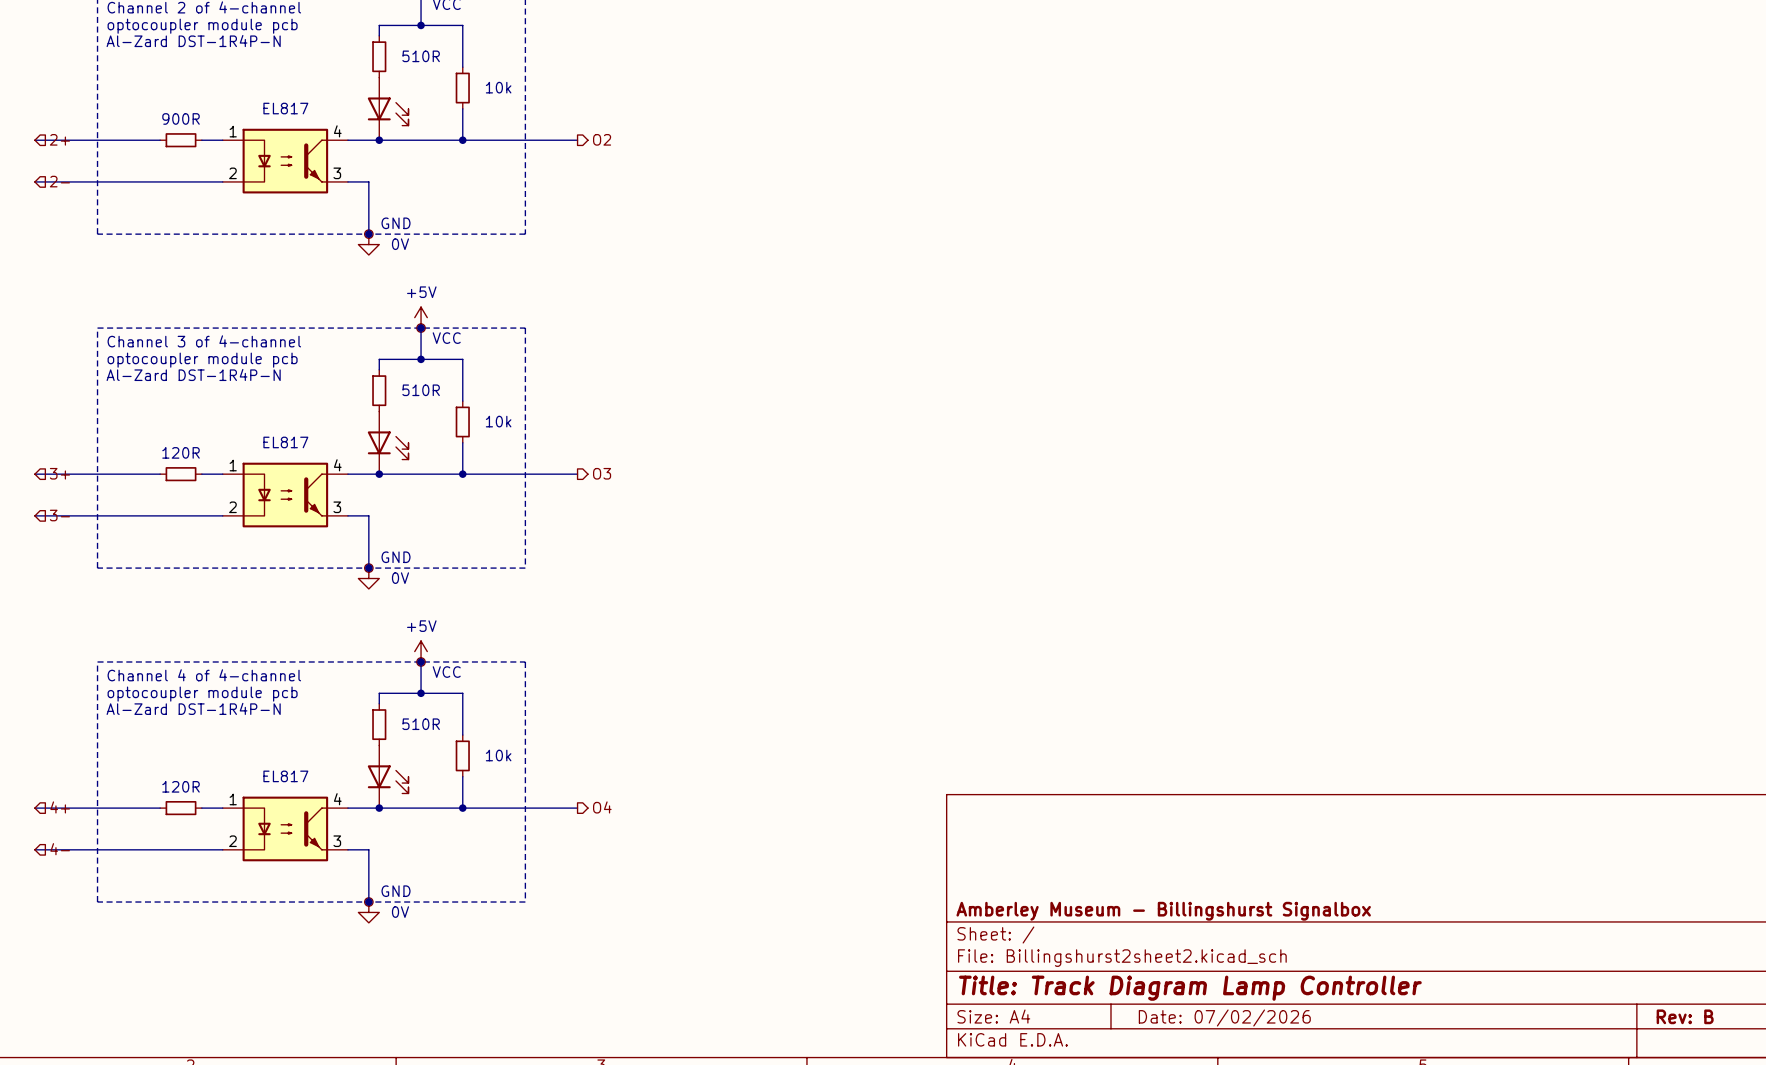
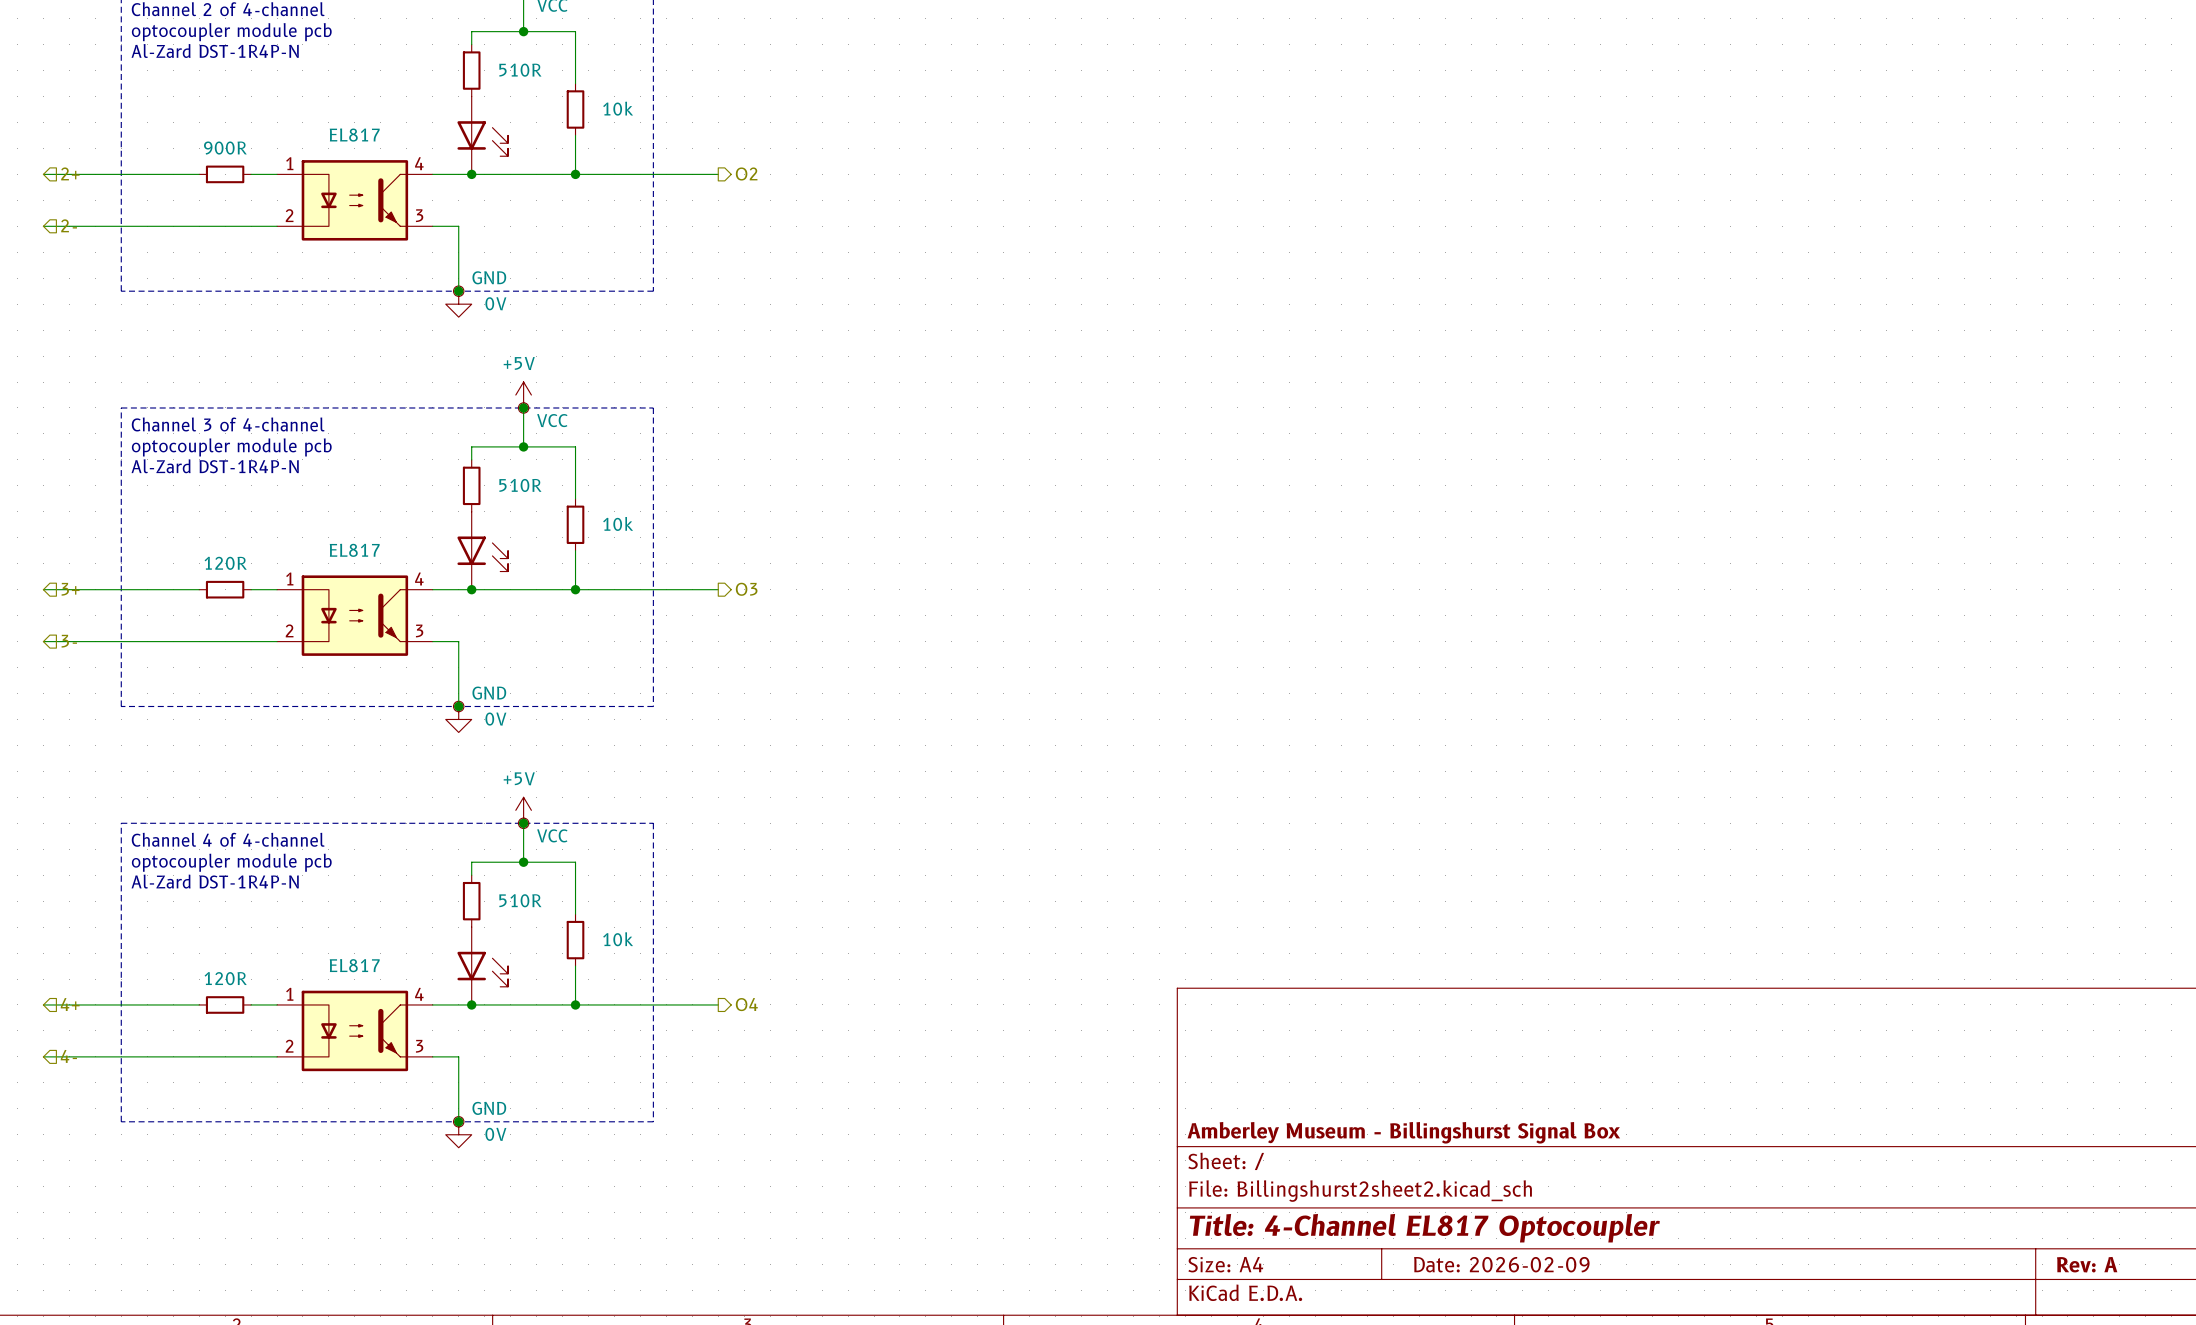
title block: Amberley Museum - Billingshurst Signalbox (1163, 911) -> Amberley Museum - Billingshurst Signal Box (1403, 1132)
title block: Title: Track Diagram Lamp Controller (1190, 988) -> Title: 4-Channel EL817 Optocoupler (1424, 1228)
title block: Rev: B (1685, 1016) -> Rev: A (2087, 1264)
title block: Date: 07/02/2026 (1224, 1018) -> Date: 2026-02-09 (1501, 1264)

